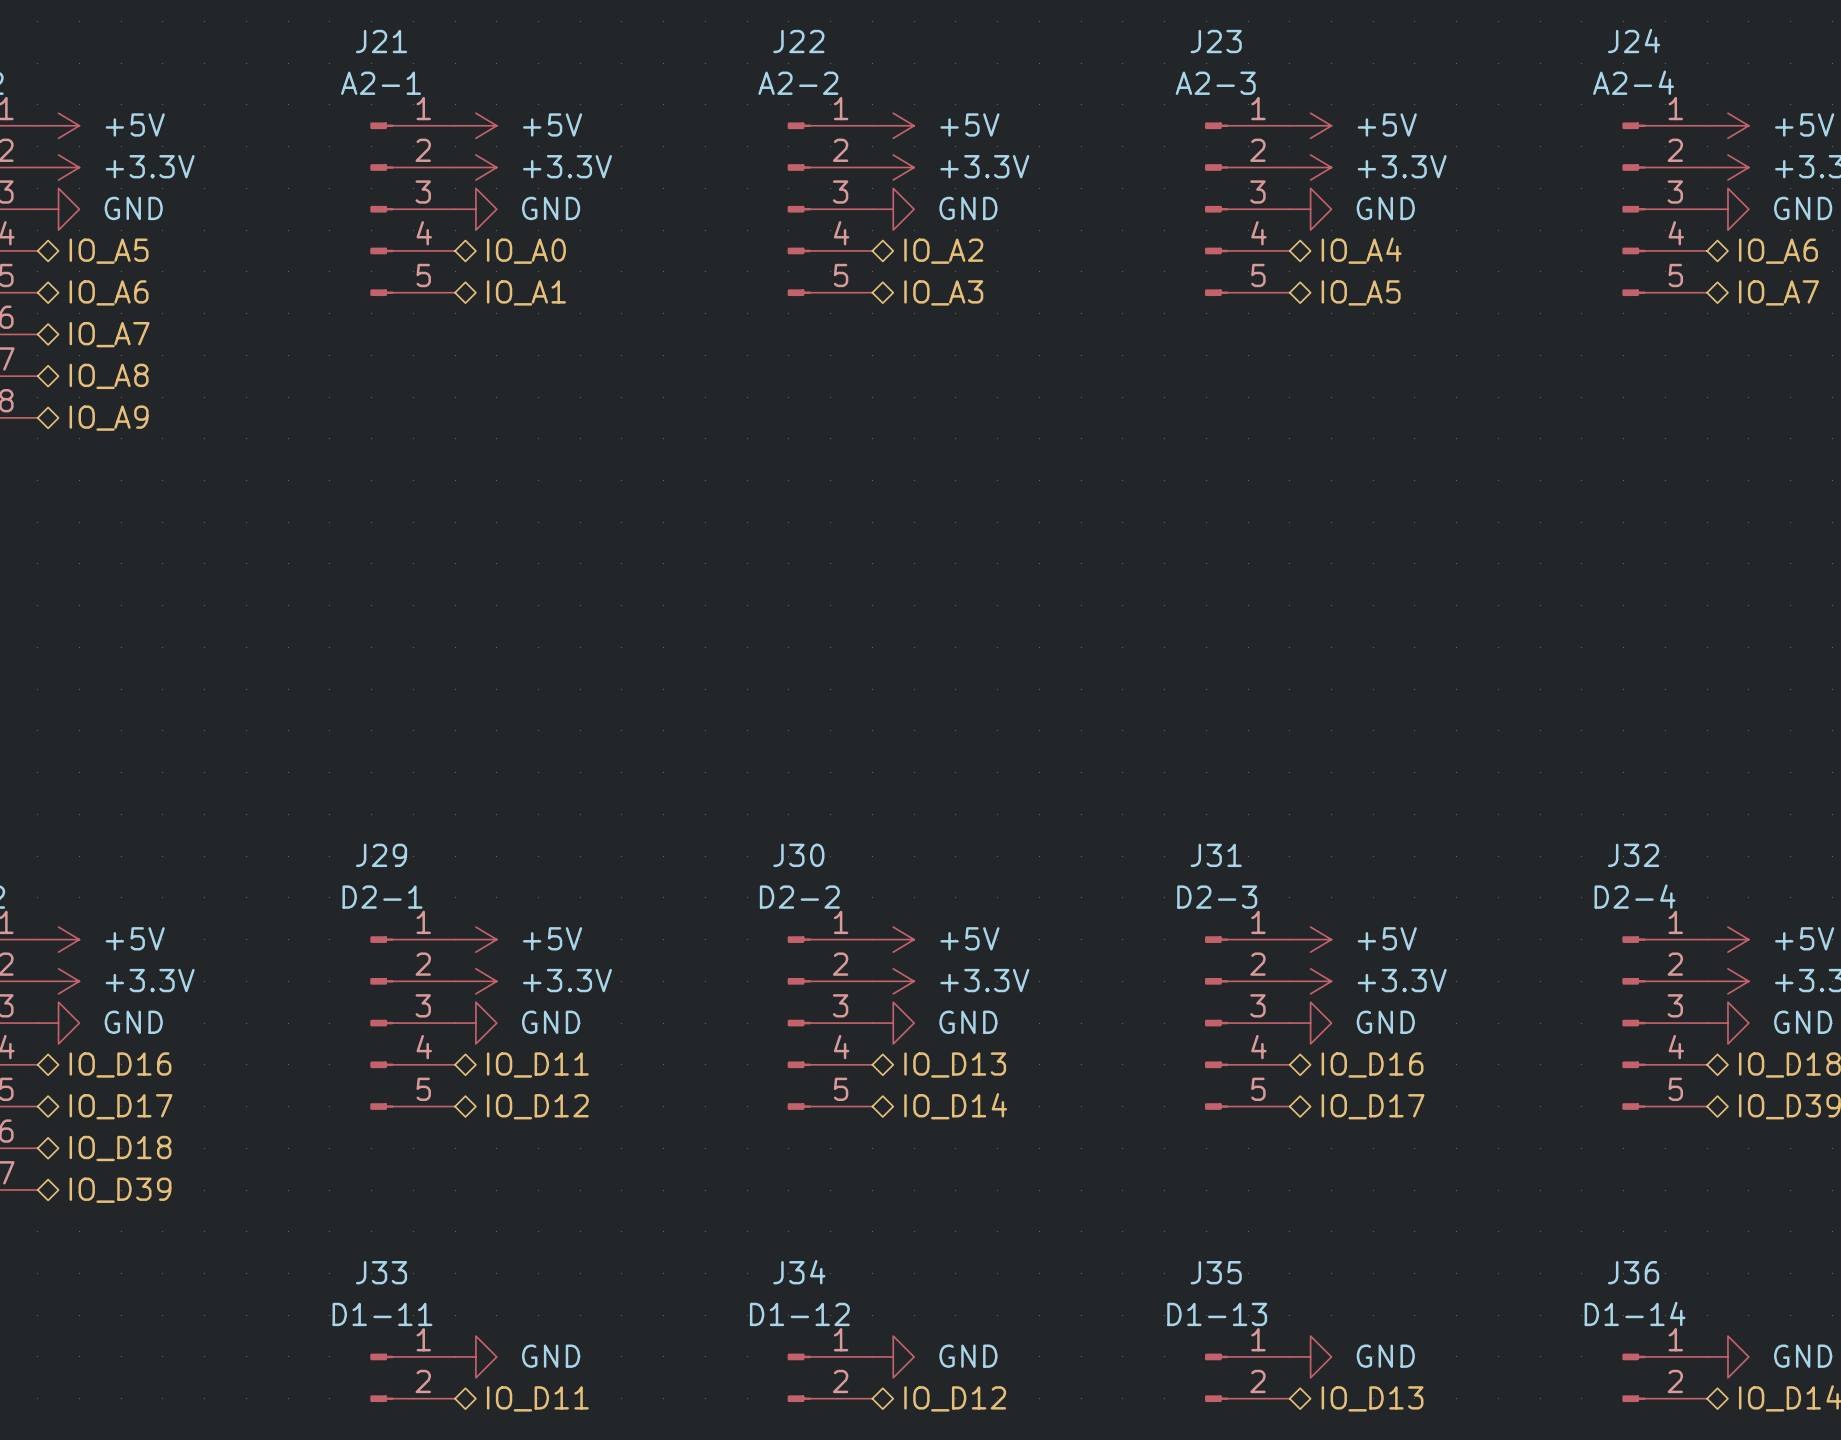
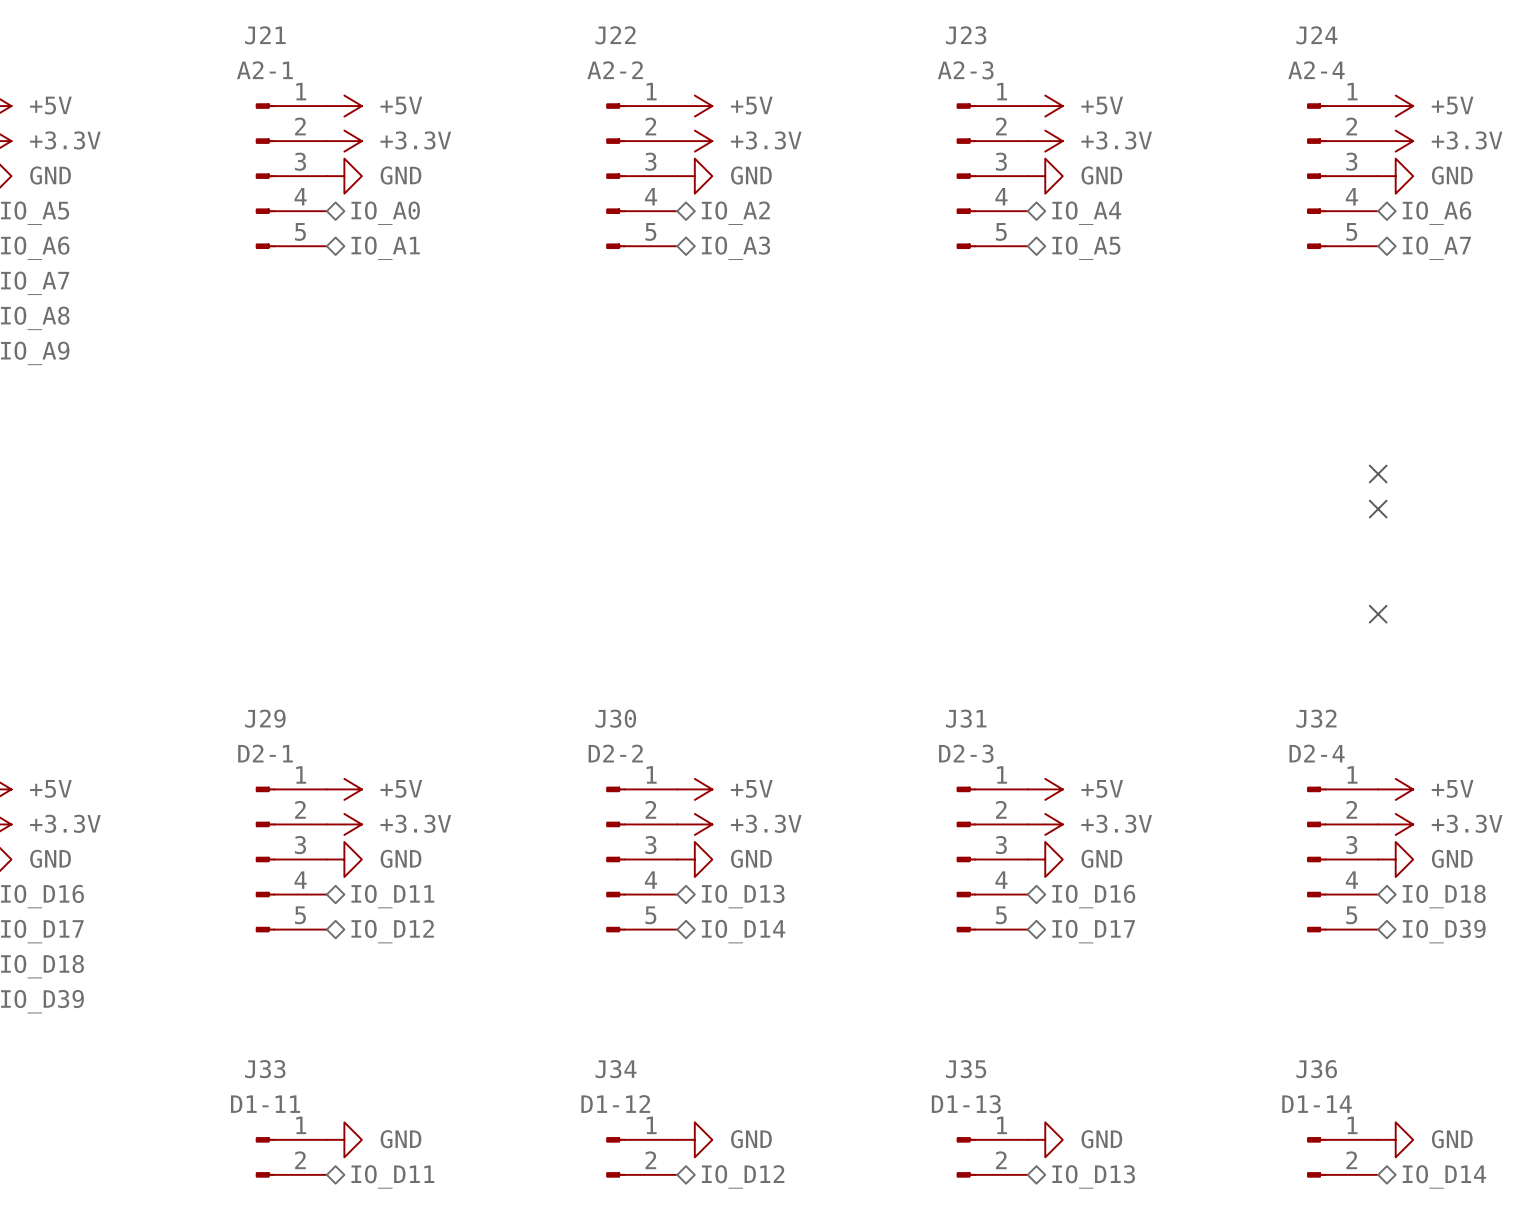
no-connect mark: none -> (1378, 474)
no-connect mark: none -> (1378, 509)
no-connect mark: none -> (1378, 614)

